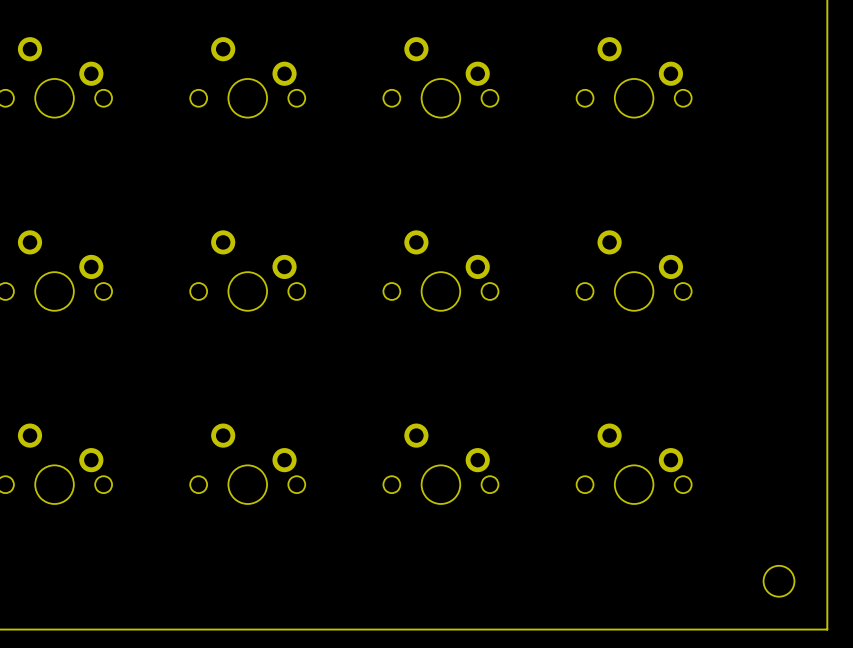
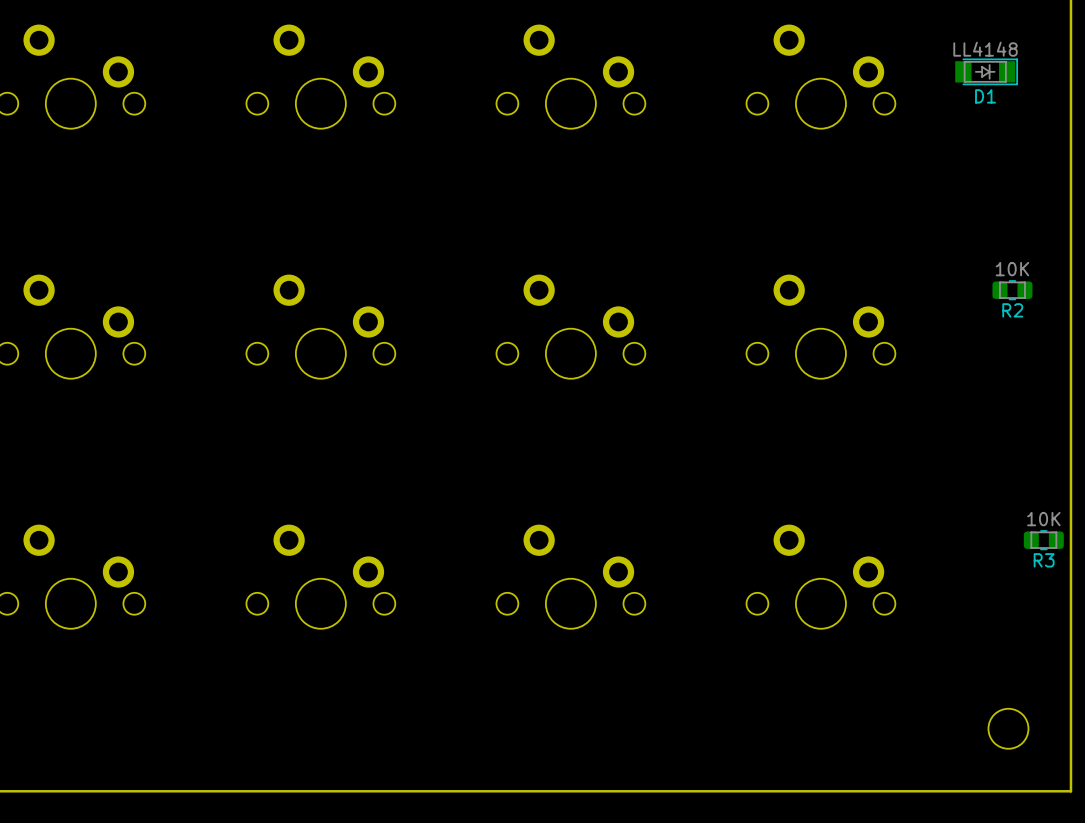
D1: none -> LL4148 (986, 71)
R2: none -> 10K (1012, 290)
R3: none -> 10K (1043, 540)

